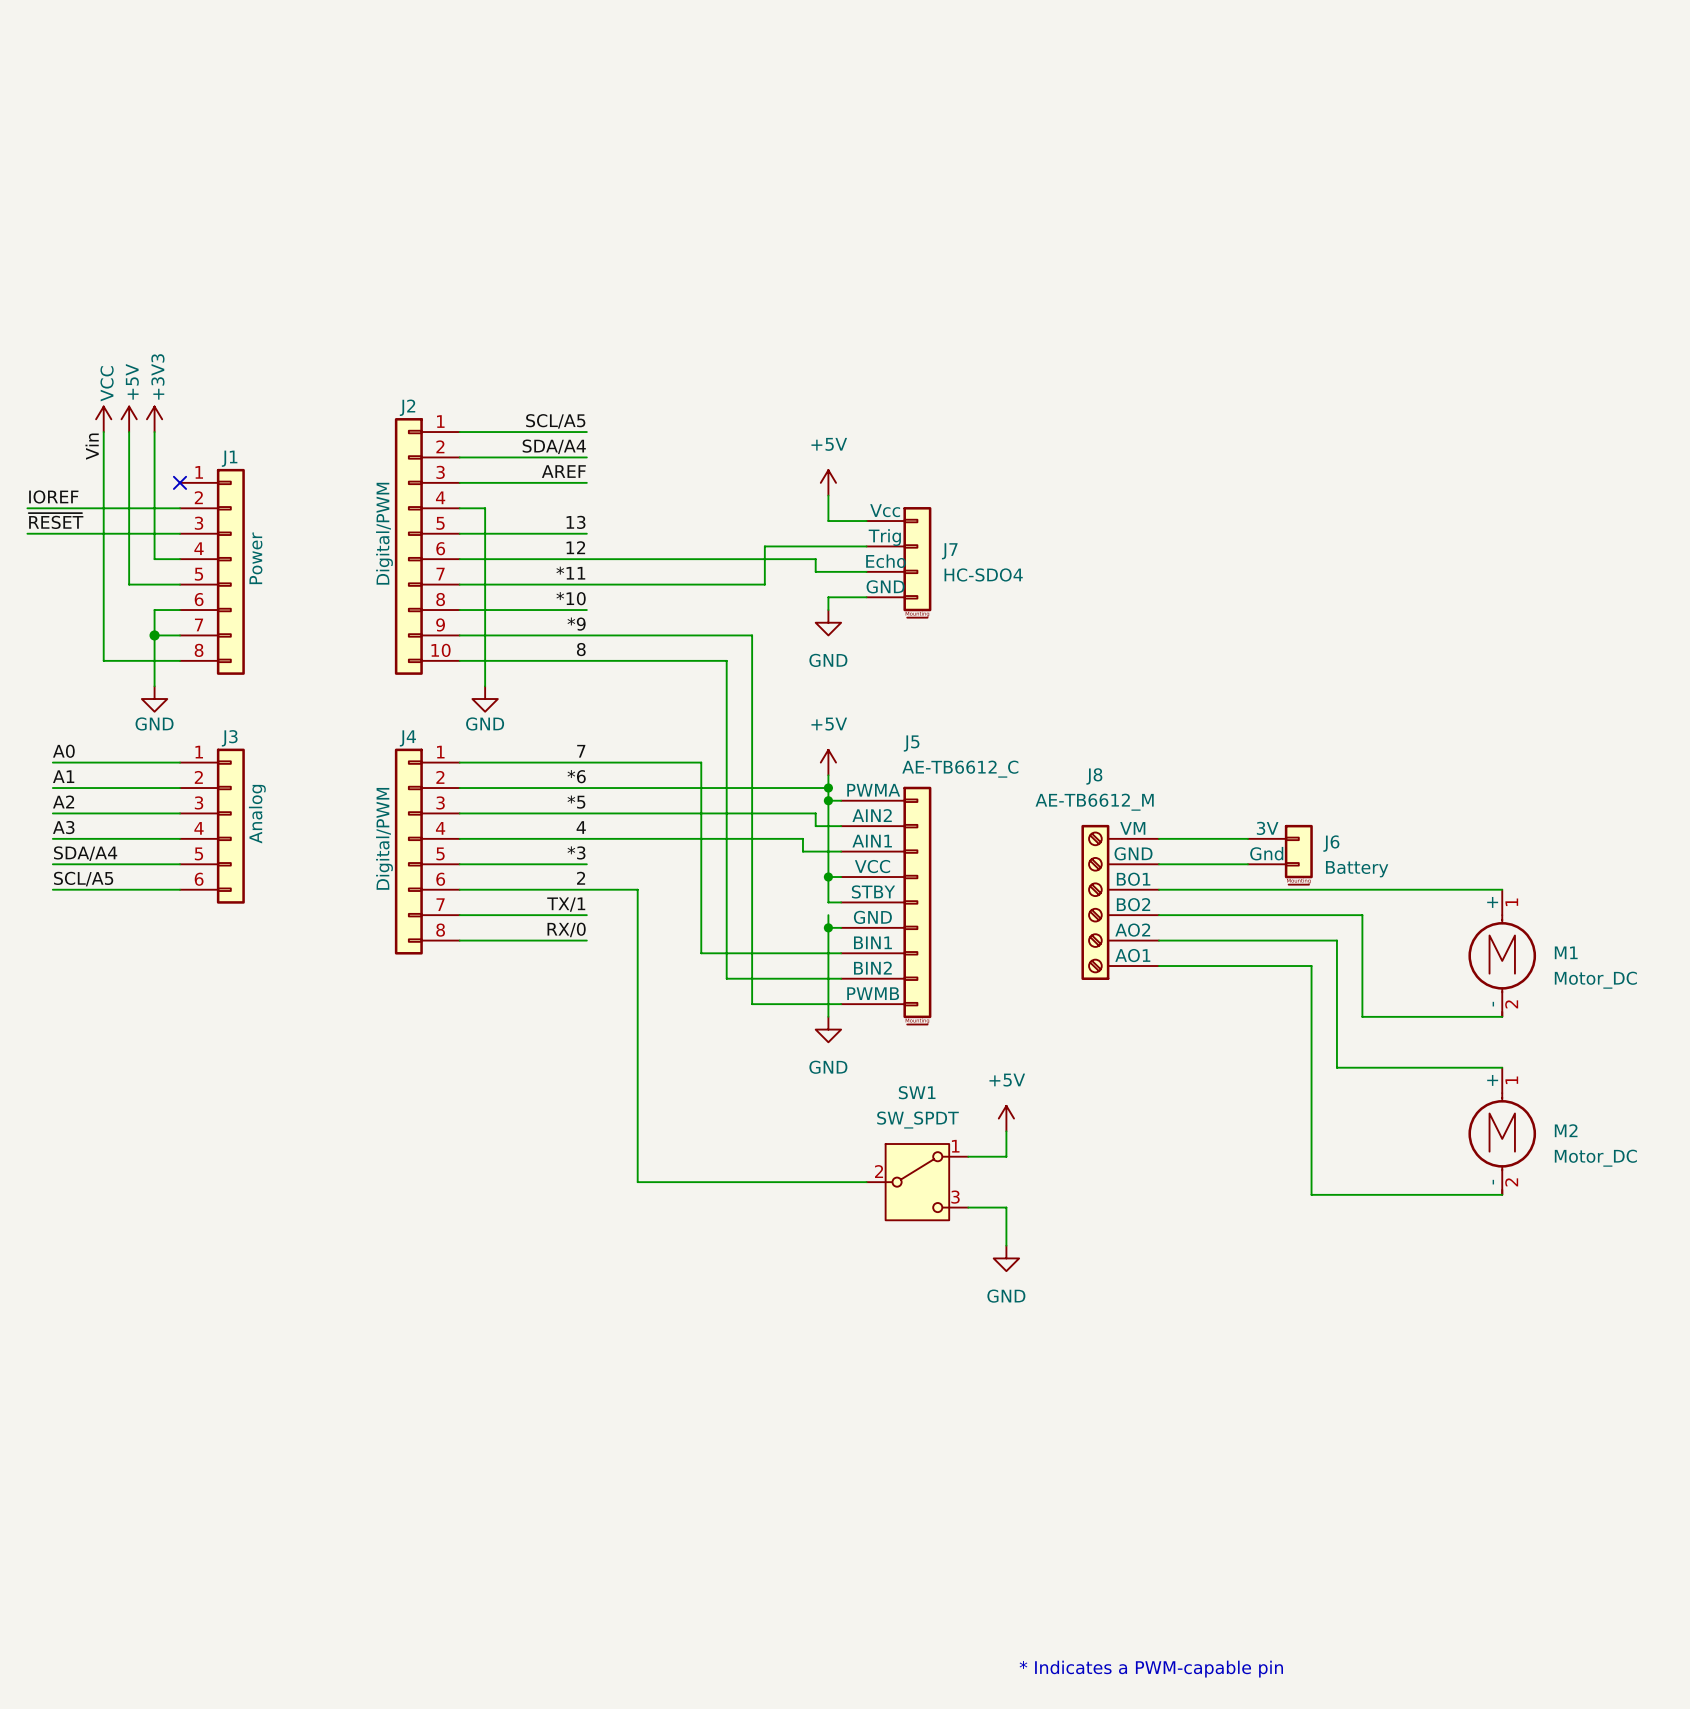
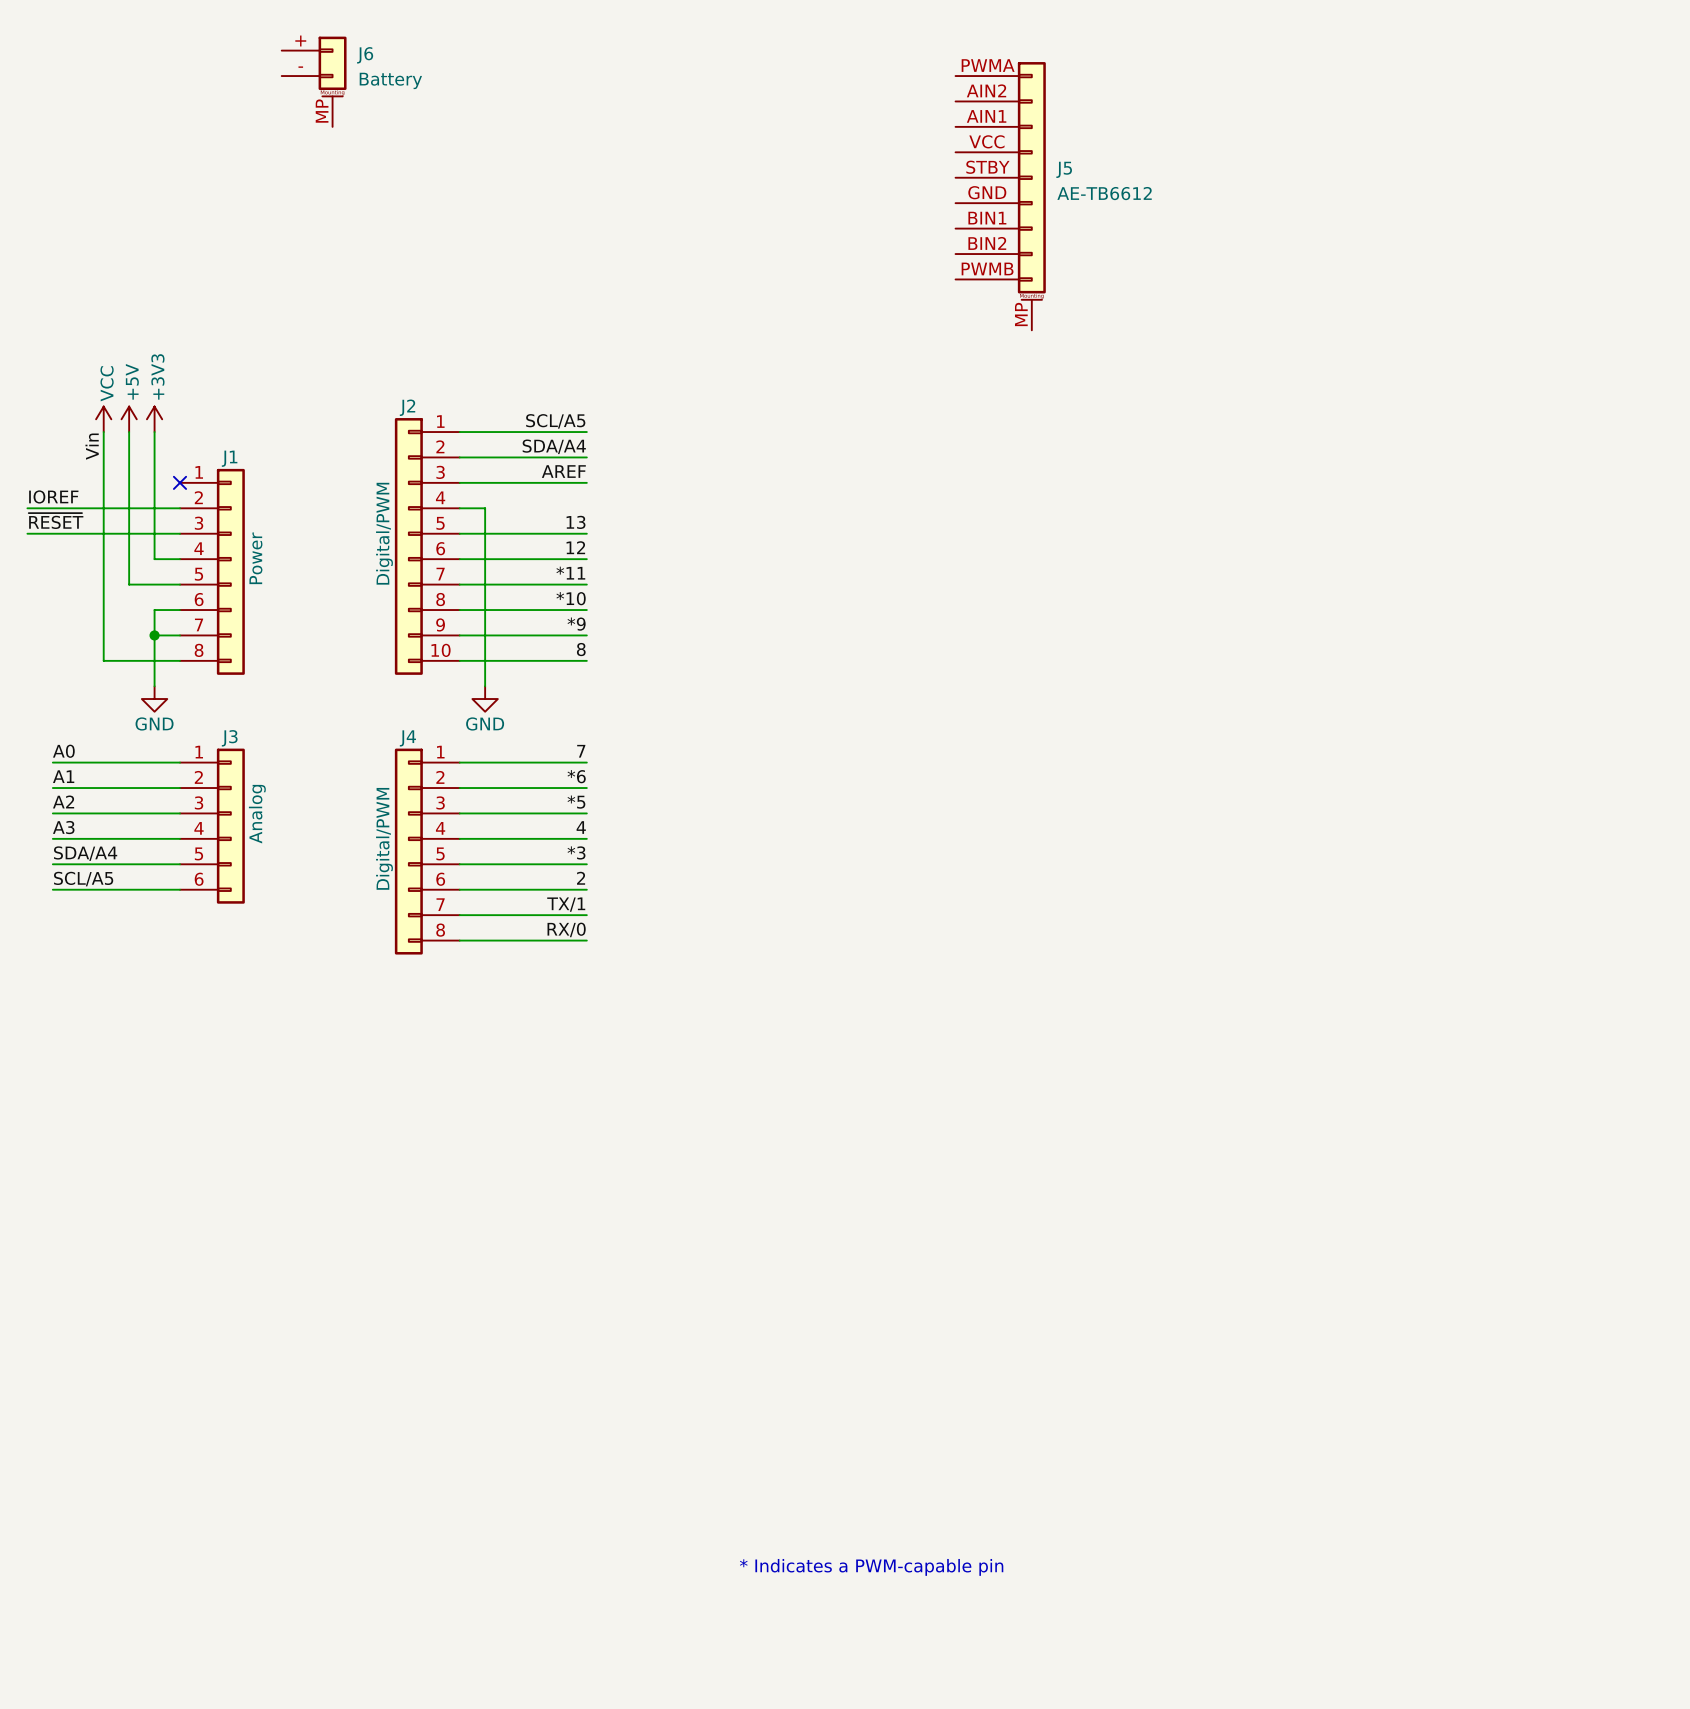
power symbol: +5V (828, 482) -> none
wire: (828, 495) (828, 521) (866, 521) -> none
wire: (866, 546) (764, 546) (764, 584) (586, 584) -> none
wire: (586, 559) (815, 559) (815, 571) (866, 571) -> none
J7: HC-SDO4 (898, 562) -> none
wire: (866, 597) (828, 597) (828, 610) -> none
power symbol: GND (828, 622) -> none
wire: (586, 635) (752, 635) (752, 1004) (841, 1004) -> none
wire: (586, 660) (726, 660) (726, 978) (841, 978) -> none
J5 name position: J5 (911, 743) -> J5 (1064, 169)
wire: (586, 762) (701, 762) (701, 953) (841, 953) -> none
power symbol: +5V (828, 762) -> none
J5 value: AE-TB6612_C (960, 769) -> AE-TB6612 (1104, 193)
wire: (828, 775) (828, 902) (841, 902) -> none
J5 symbol: [841, 786, 932, 1026] -> [955, 62, 1046, 331]
wire: (586, 788) (828, 788) -> none
junction: (828, 788) -> none
wire: (828, 800) (841, 800) -> none
junction: (828, 800) -> none
wire: (586, 813) (815, 813) (815, 826) (841, 826) -> none
J6 symbol: [1247, 824, 1313, 886] -> [281, 36, 347, 127]
wire: (586, 838) (802, 838) (802, 851) (841, 851) -> none
wire: (1158, 838) (1247, 838) -> none
wire: (1158, 864) (1247, 864) -> none
wire: (828, 877) (841, 877) -> none
junction: (828, 877) -> none
wire: (586, 889) (637, 889) (637, 1182) (866, 1182) -> none
wire: (1158, 889) (1502, 889) -> none
J8: AE-TB6612_M (1120, 902) -> none
wire: (828, 915) (828, 1016) -> none
wire: (1158, 915) (1362, 915) (1362, 1016) (1502, 1016) -> none
wire: (828, 927) (841, 927) -> none
junction: (828, 927) -> none
wire: (1158, 940) (1336, 940) (1336, 1067) (1502, 1067) -> none
M1: Motor_DC (1502, 953) -> none
wire: (1158, 966) (1311, 966) (1311, 1194) (1502, 1194) -> none
power symbol: GND (828, 1029) -> none
power symbol: +5V (1006, 1118) -> none
wire: (1006, 1131) (1006, 1156) (968, 1156) -> none
M2: Motor_DC (1502, 1131) -> none
SW1: SW_SPDT (917, 1182) -> none
wire: (968, 1207) (1006, 1207) (1006, 1245) -> none
power symbol: GND (1006, 1258) -> none
text: none -> * Indicates a PWM-capable pin (871, 1567)
text: * Indicates a PWM-capable pin (1151, 1669) -> none

